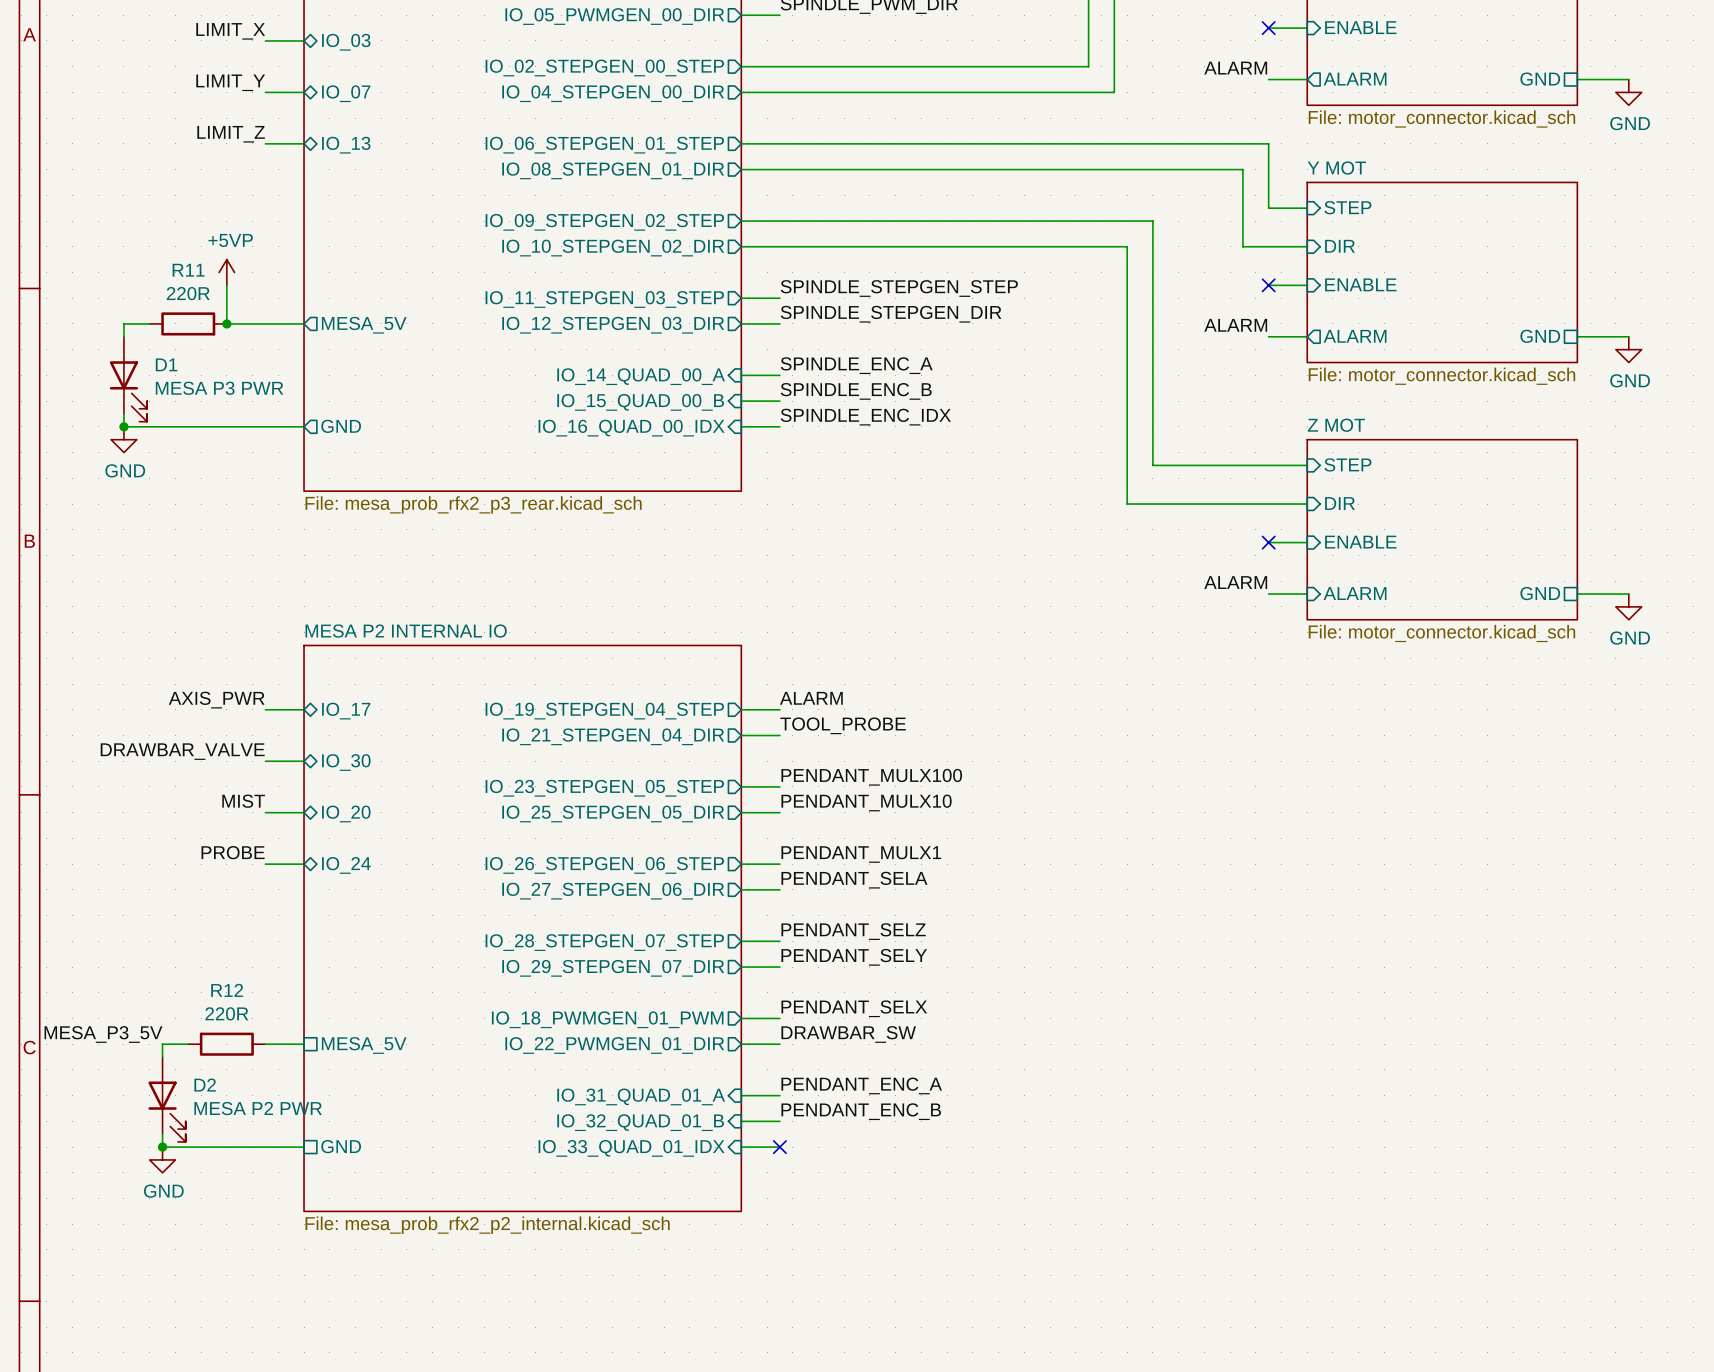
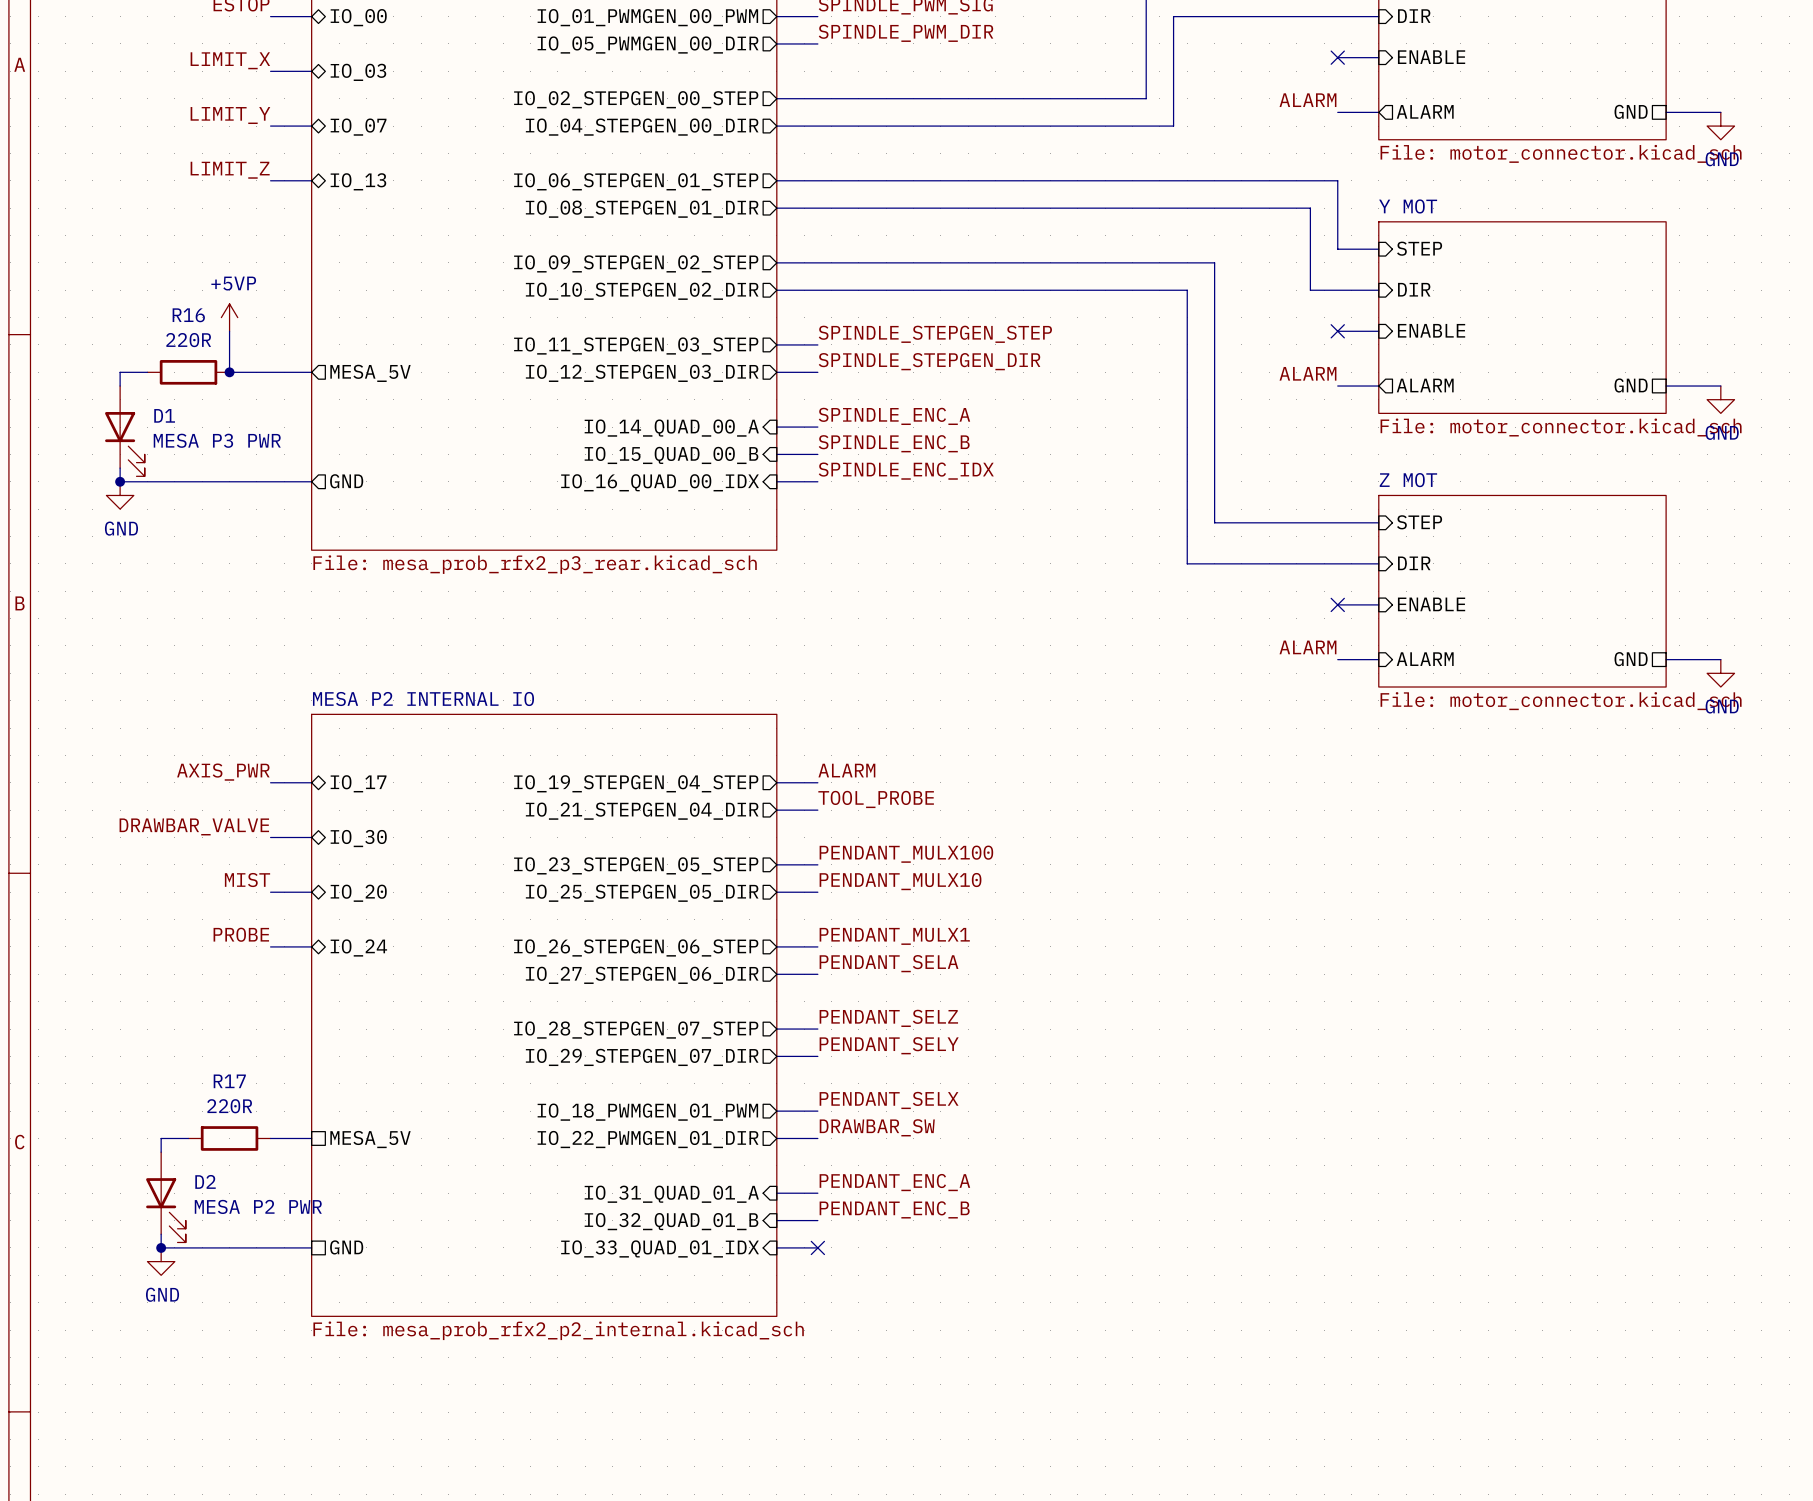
R11 name: R11 (188, 270) -> R16 (188, 315)
R12 name: R12 (227, 990) -> R17 (229, 1081)
label: MESA_P3_5V (103, 1034) -> none

